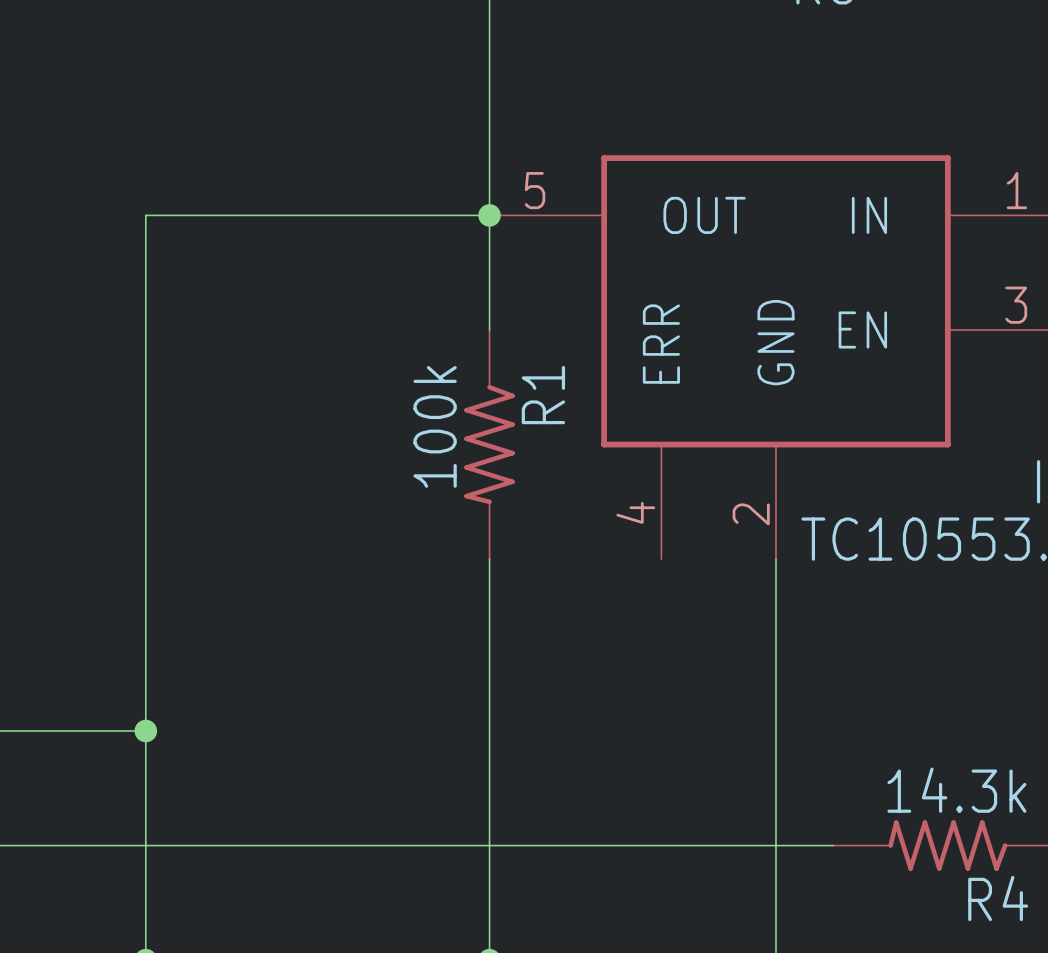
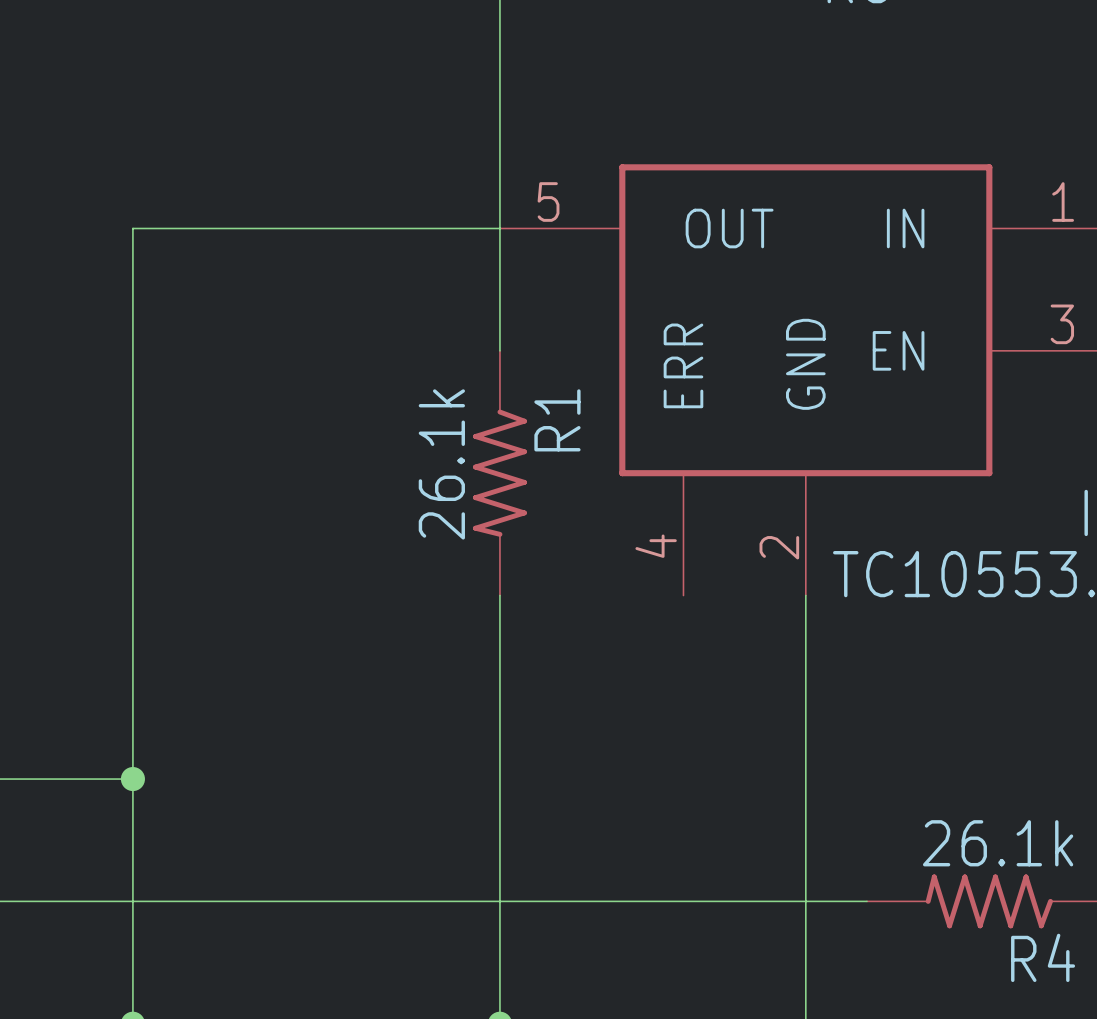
junction: (489, 215) -> none
R1 value: 100k (435, 426) -> 26.1k (441, 464)
R4 value: 14.3k (956, 790) -> 26.1k (998, 843)

